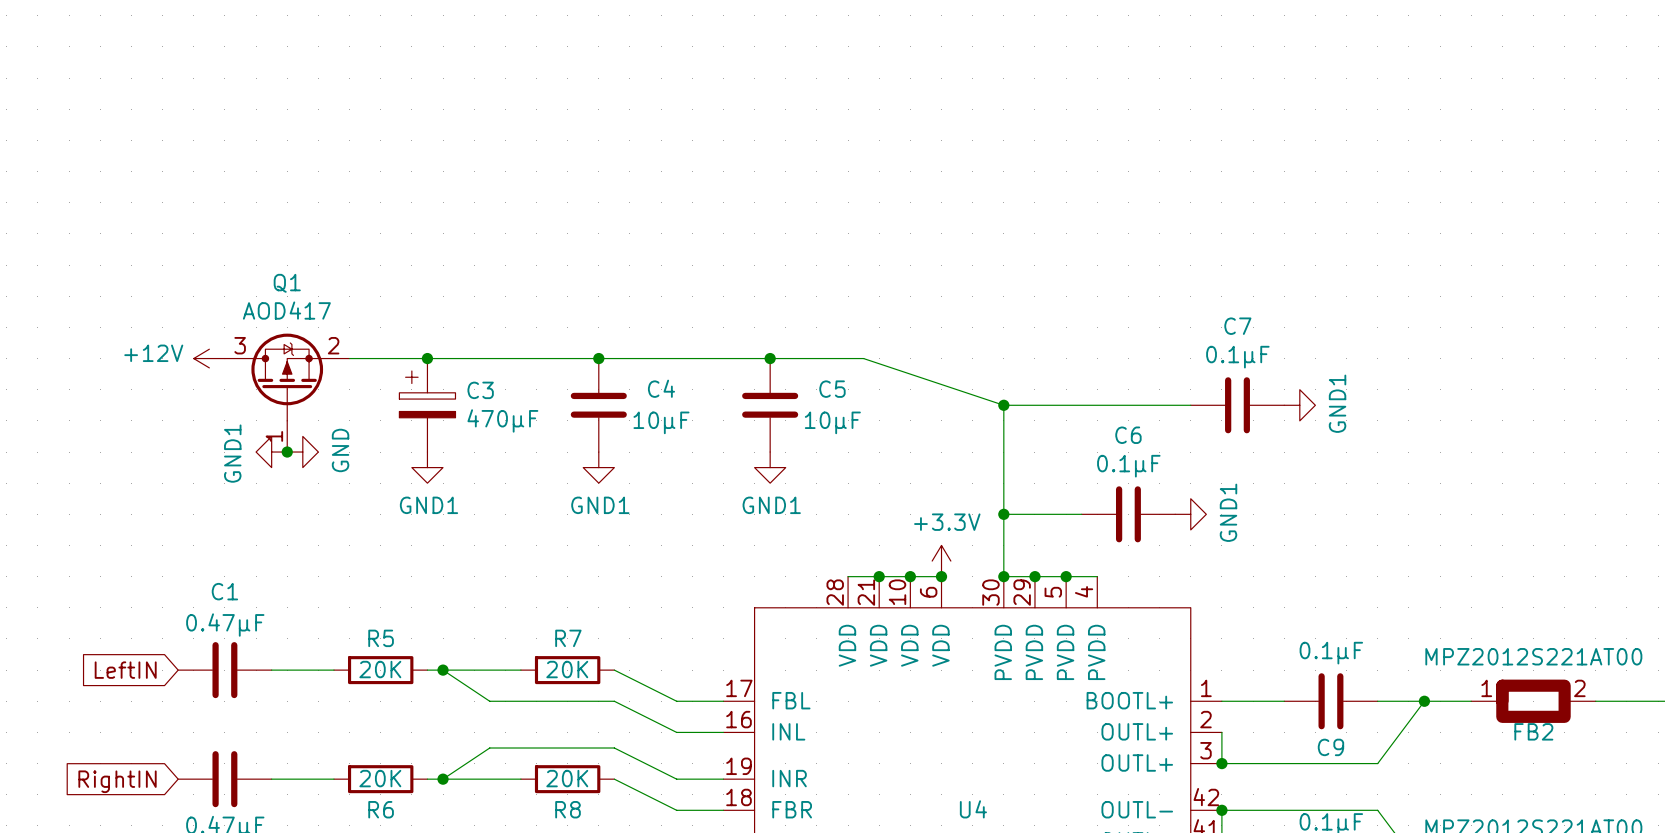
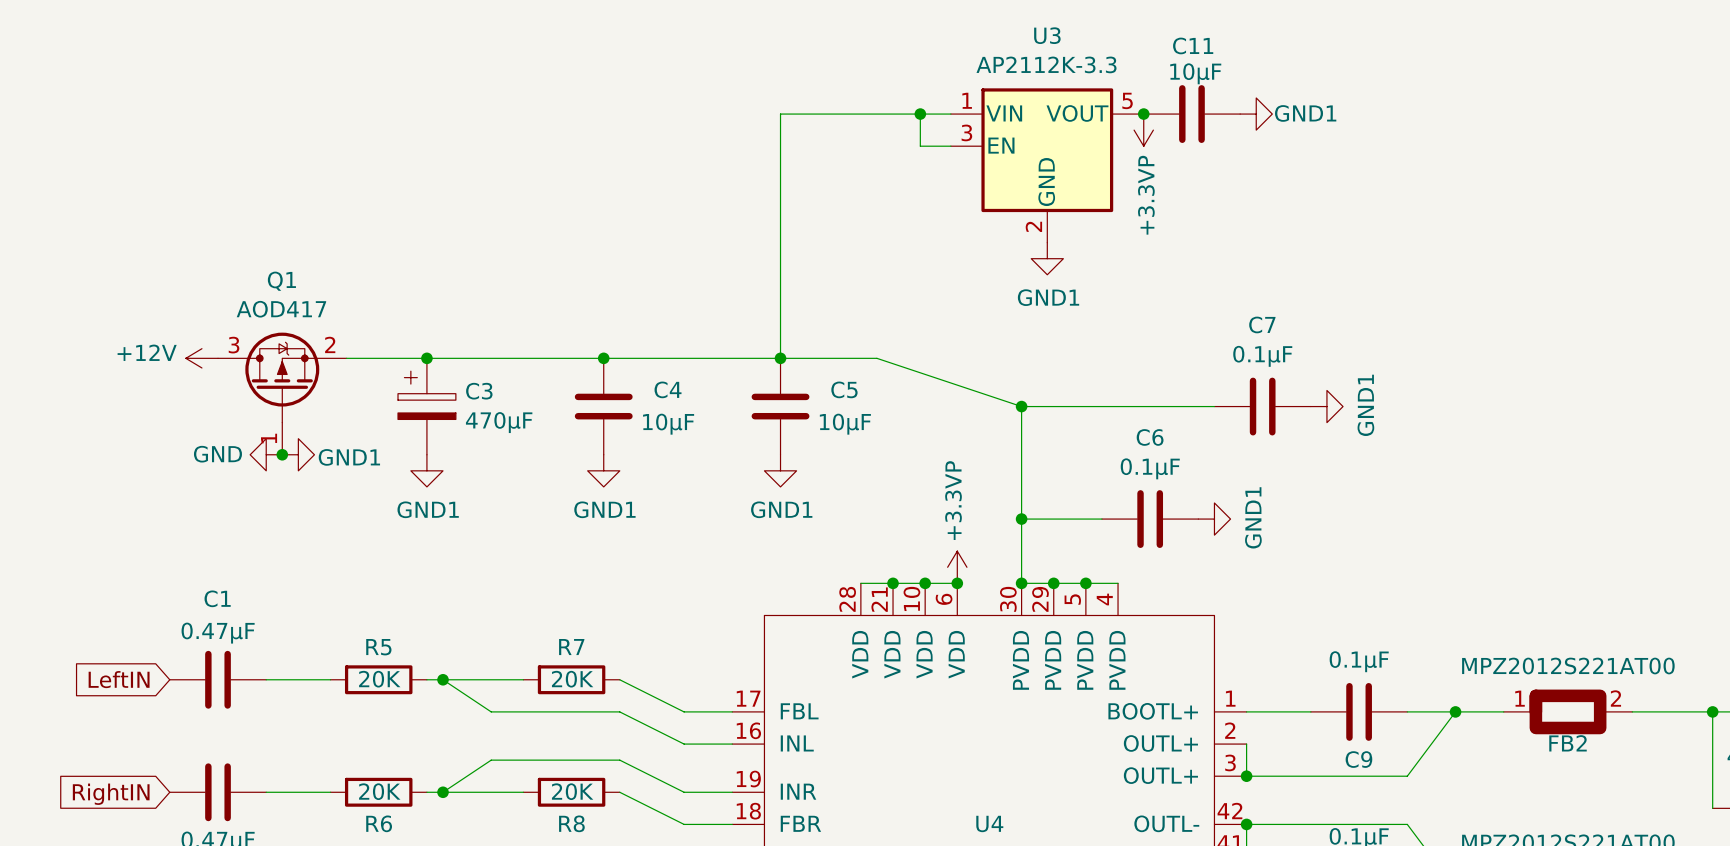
wire: none -> (920, 114) (920, 146) (950, 146)
junction: none -> (920, 114)
wire: none -> (950, 114) (780, 114) (780, 358)
junction: none -> (1143, 114)
C11: none -> 10µF (1191, 114)
power symbol: none -> GND1 (1256, 114)
power symbol: none -> +3.3VP (1143, 130)
U3: none -> AP2112K-3.3 (1047, 165)
power symbol: none -> GND1 (1047, 258)
power symbol: GND1 (271, 452) -> GND (266, 454)
power symbol: GND (302, 452) -> GND1 (298, 454)
power symbol: +3.3V (941, 561) -> +3.3VP (957, 567)

